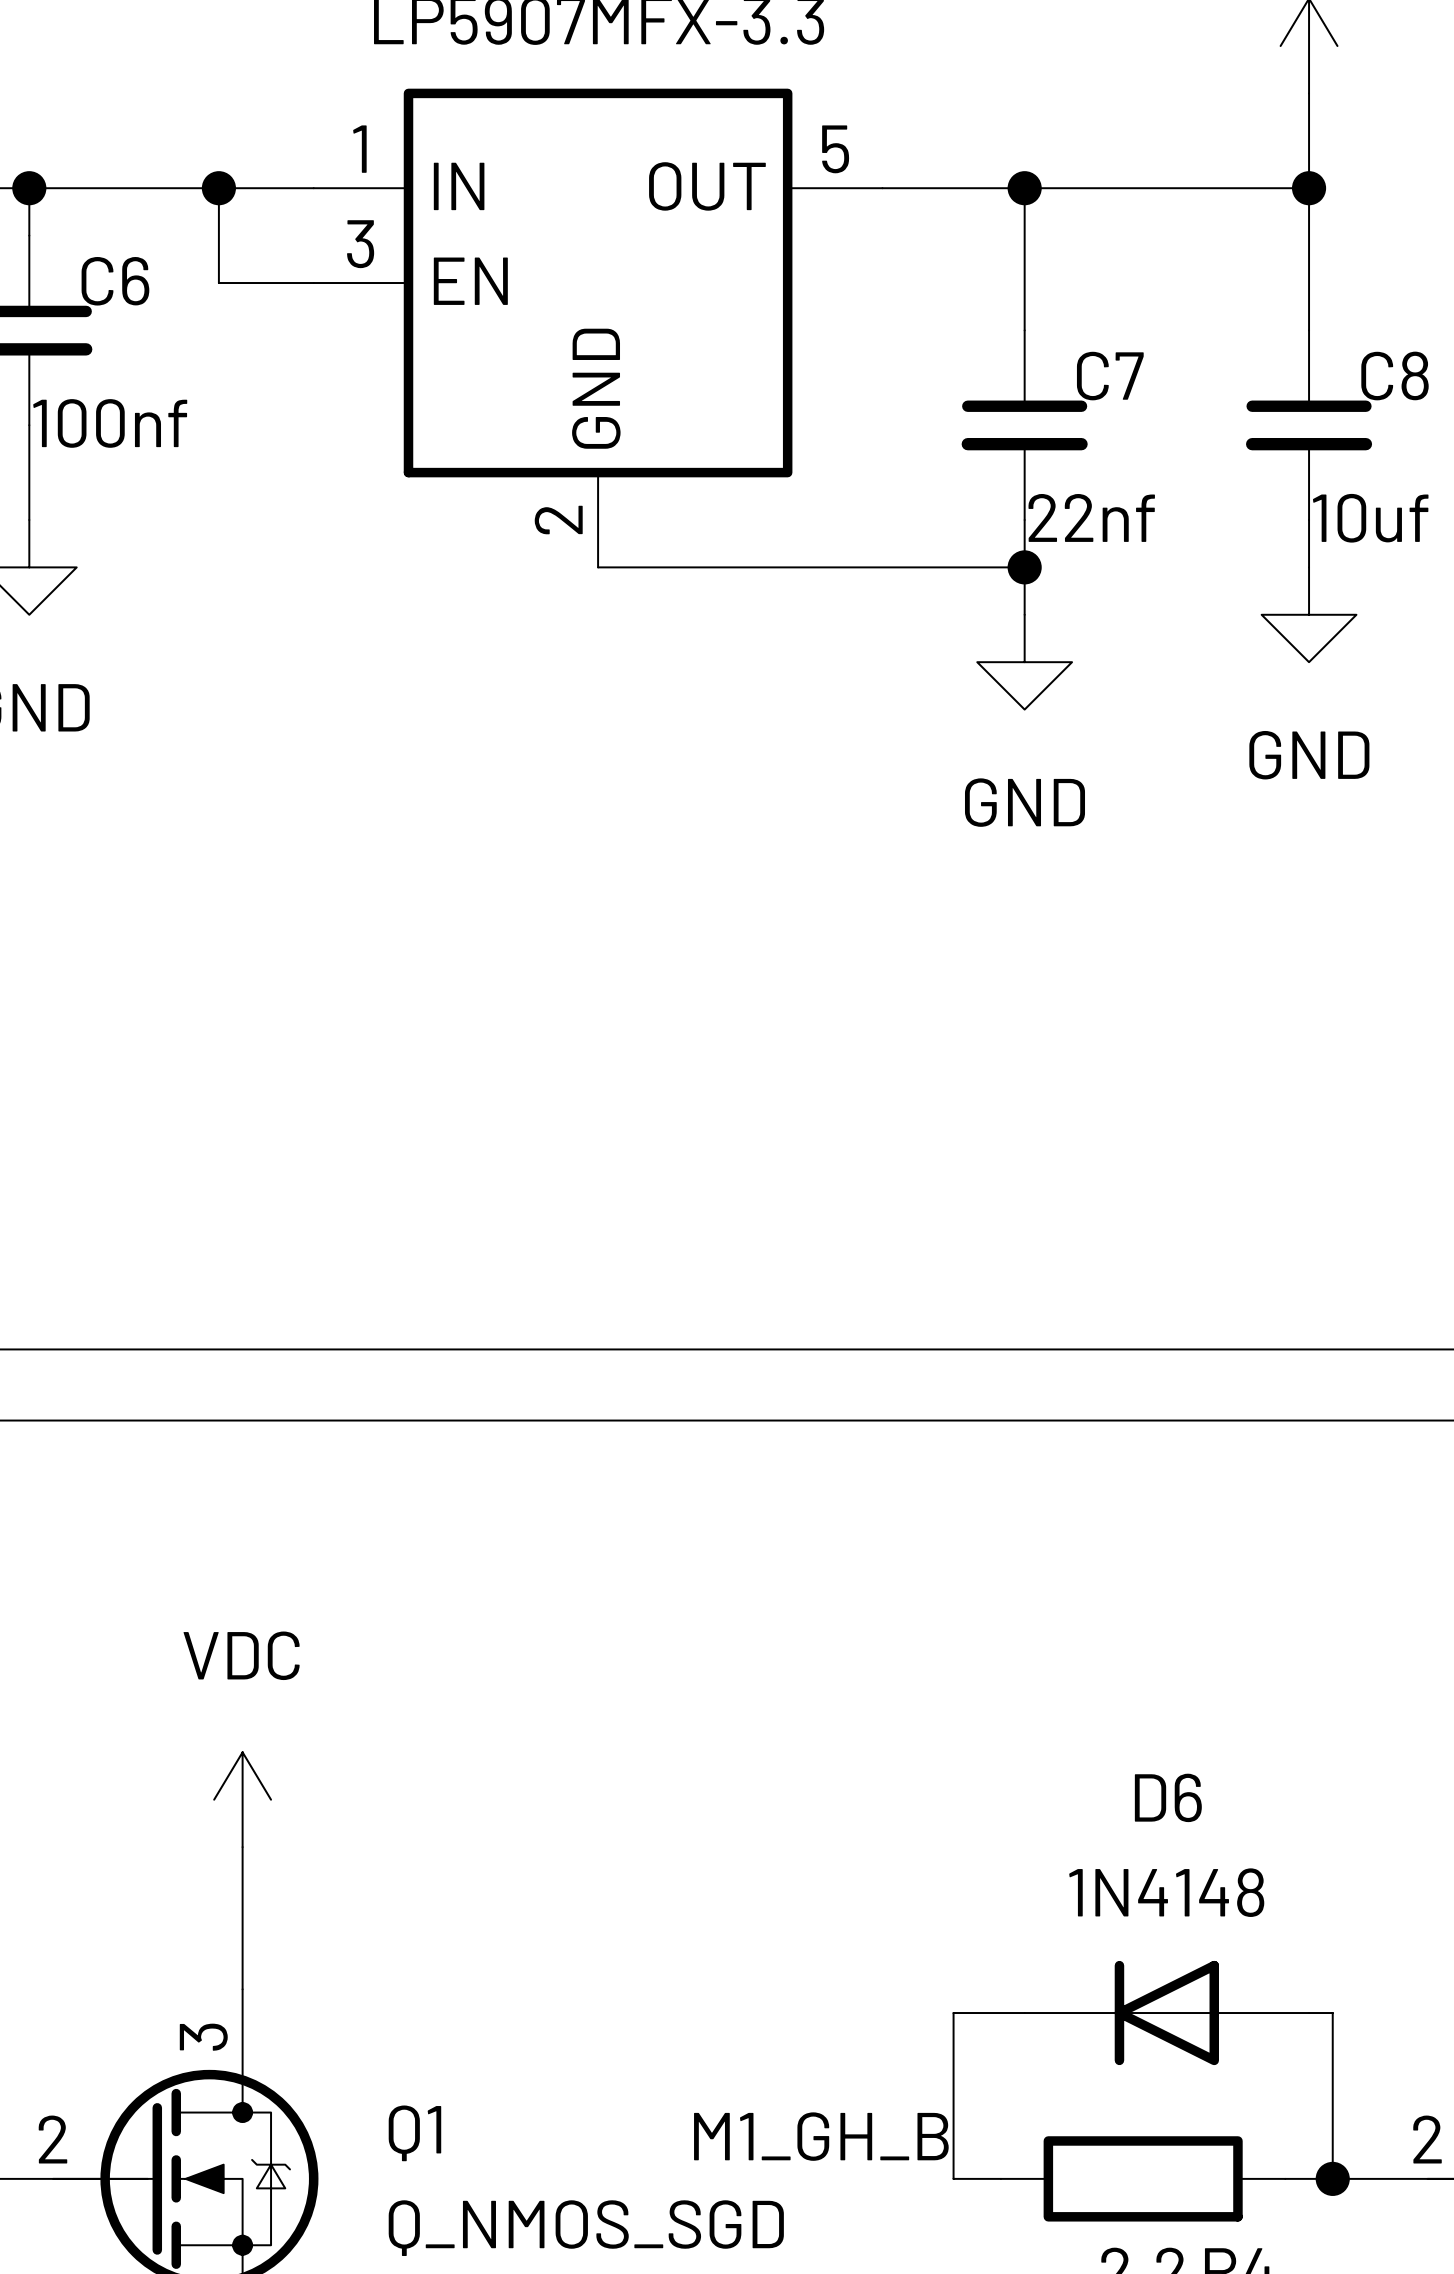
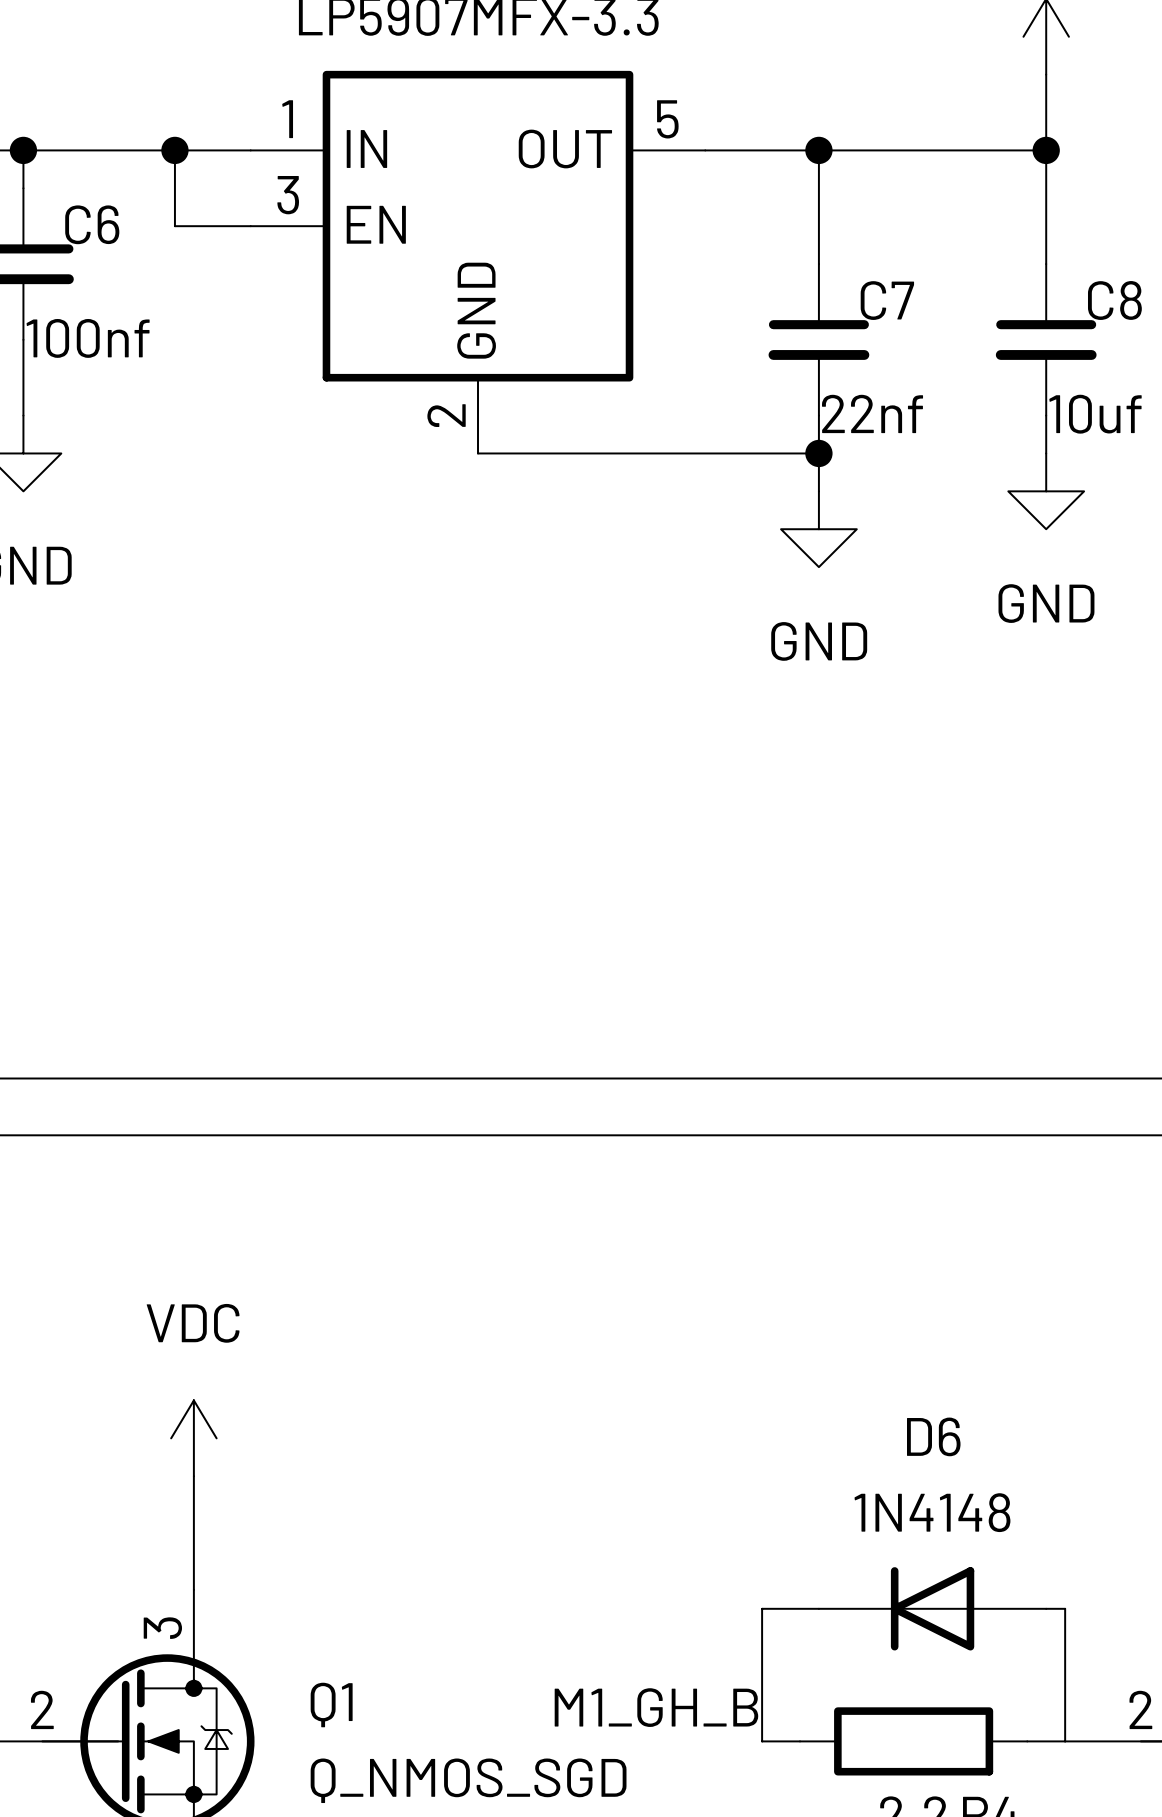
junction: (1332, 2178) -> none

